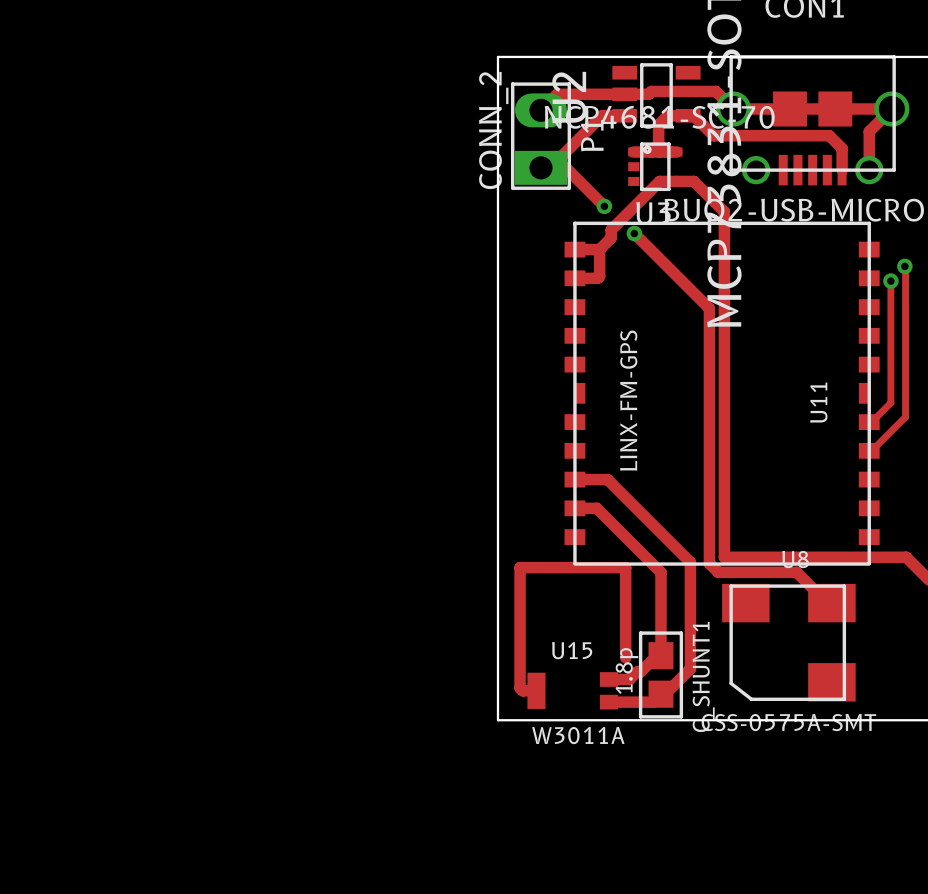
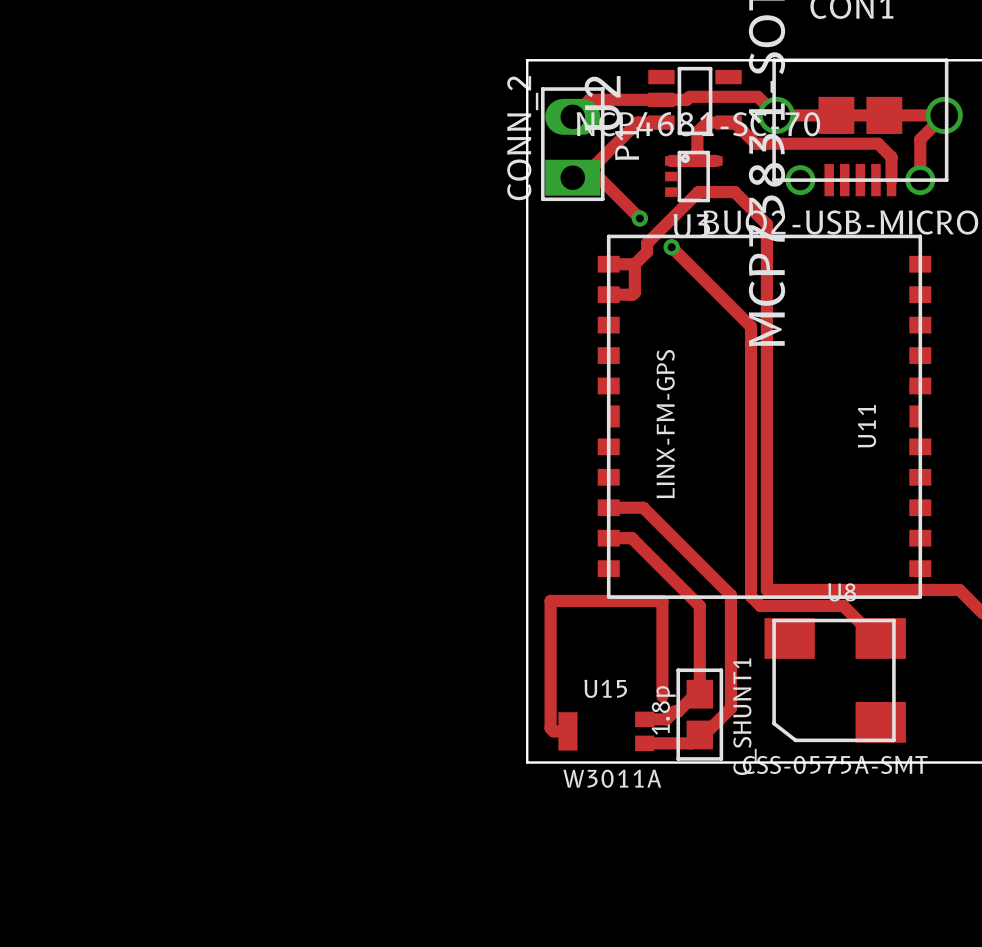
track: (904, 266) (905, 417) (871, 450) (869, 450) -> none
via: (904, 266) -> none
track: (890, 281) (890, 402) (871, 422) (869, 422) -> none
via: (890, 281) -> none

